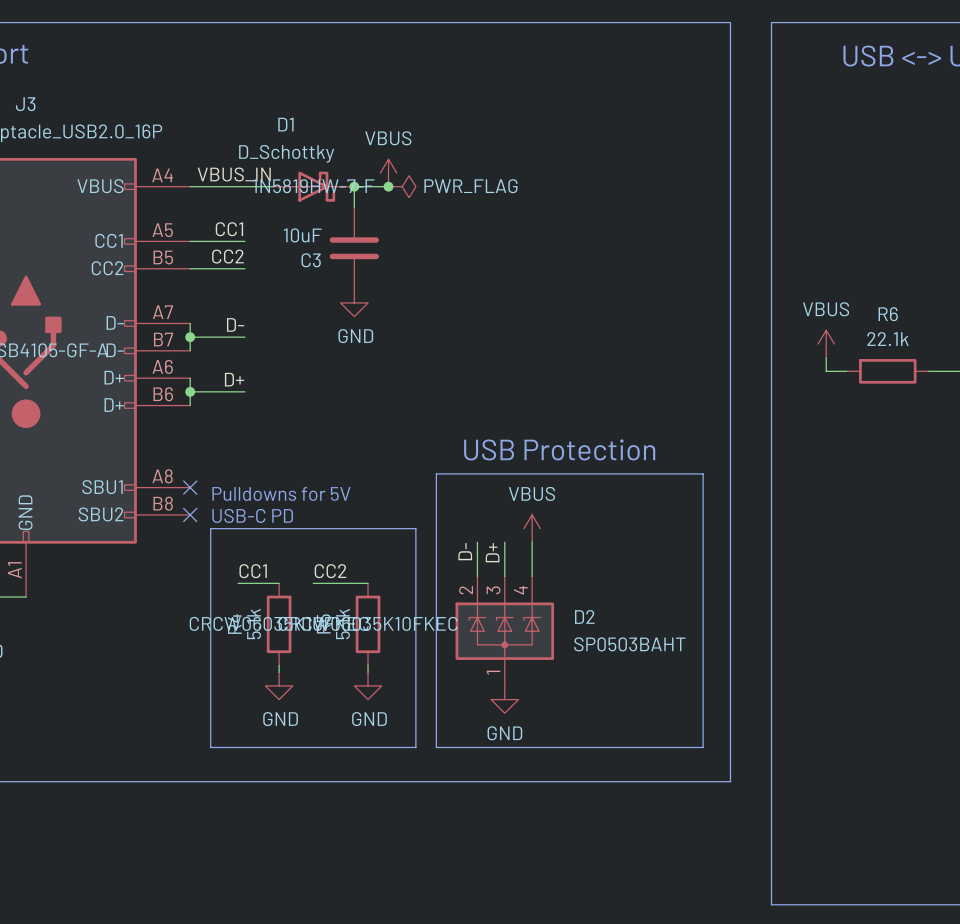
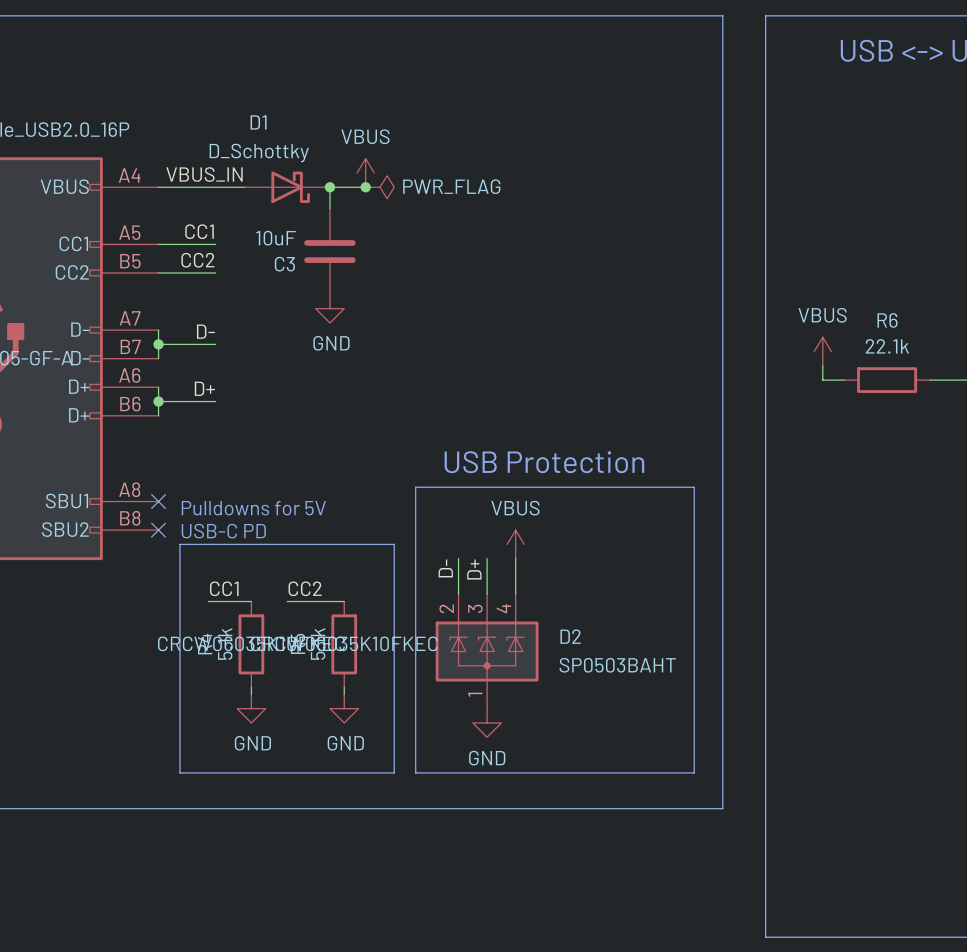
D1 text: 1N5819HW-7-F (313, 186) -> none

